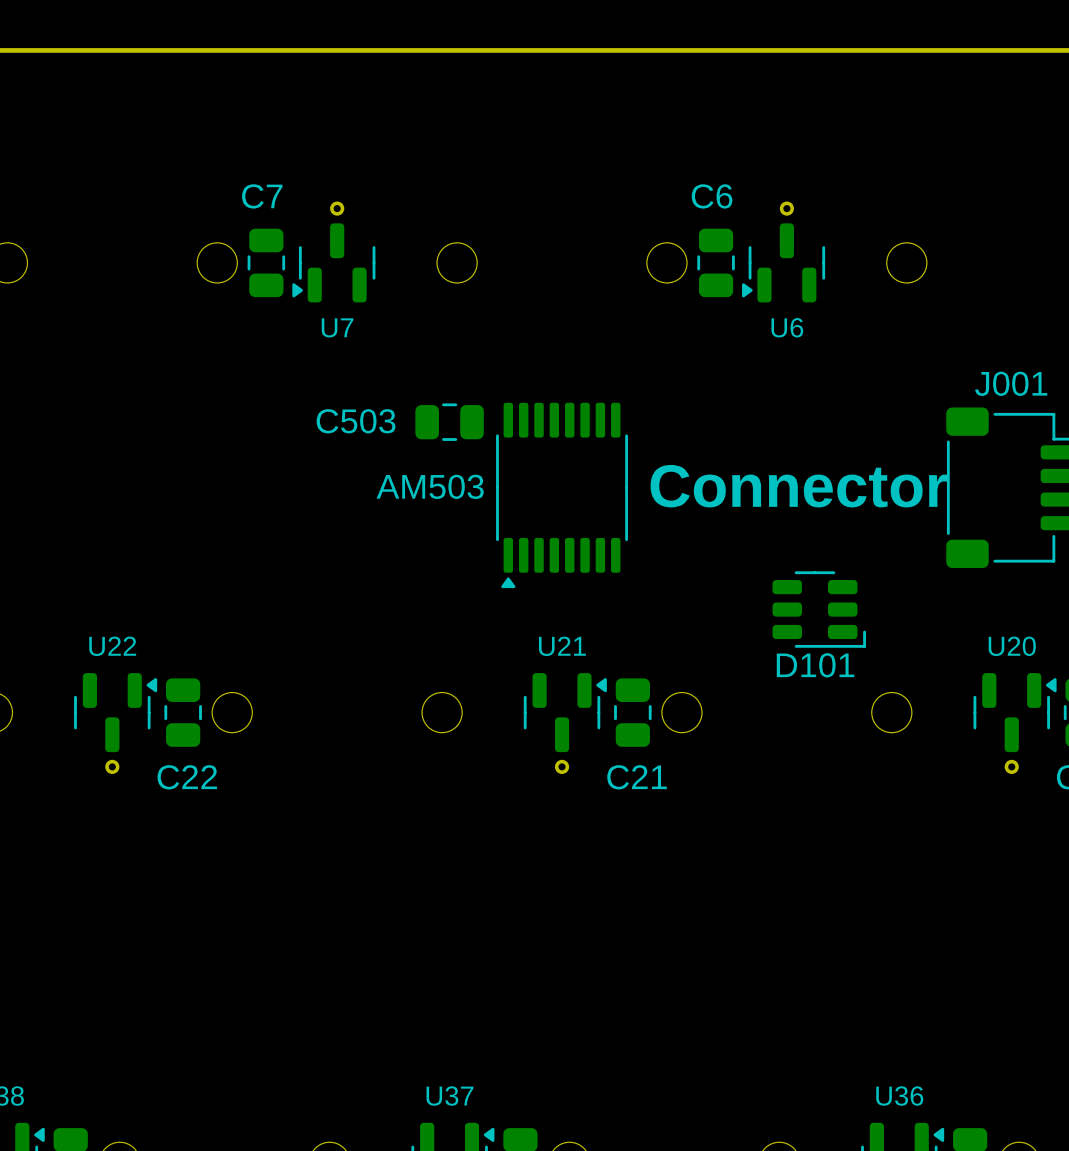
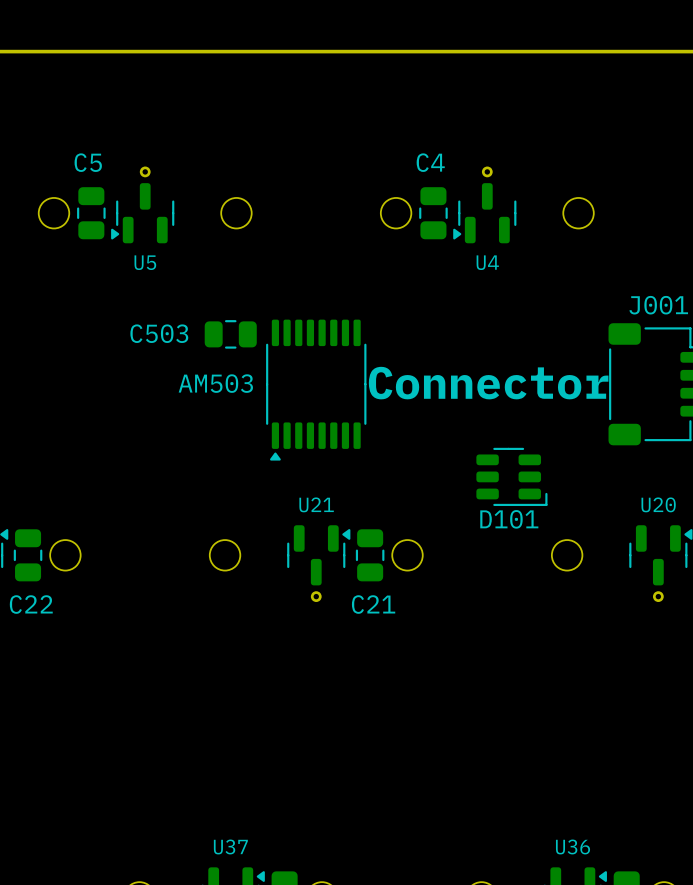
C7 name: C7 (262, 196) -> C5 (88, 162)
C6 name: C6 (712, 196) -> C4 (430, 162)
U7 name: U7 (337, 327) -> U5 (145, 262)
U6 name: U6 (787, 327) -> U4 (487, 262)

